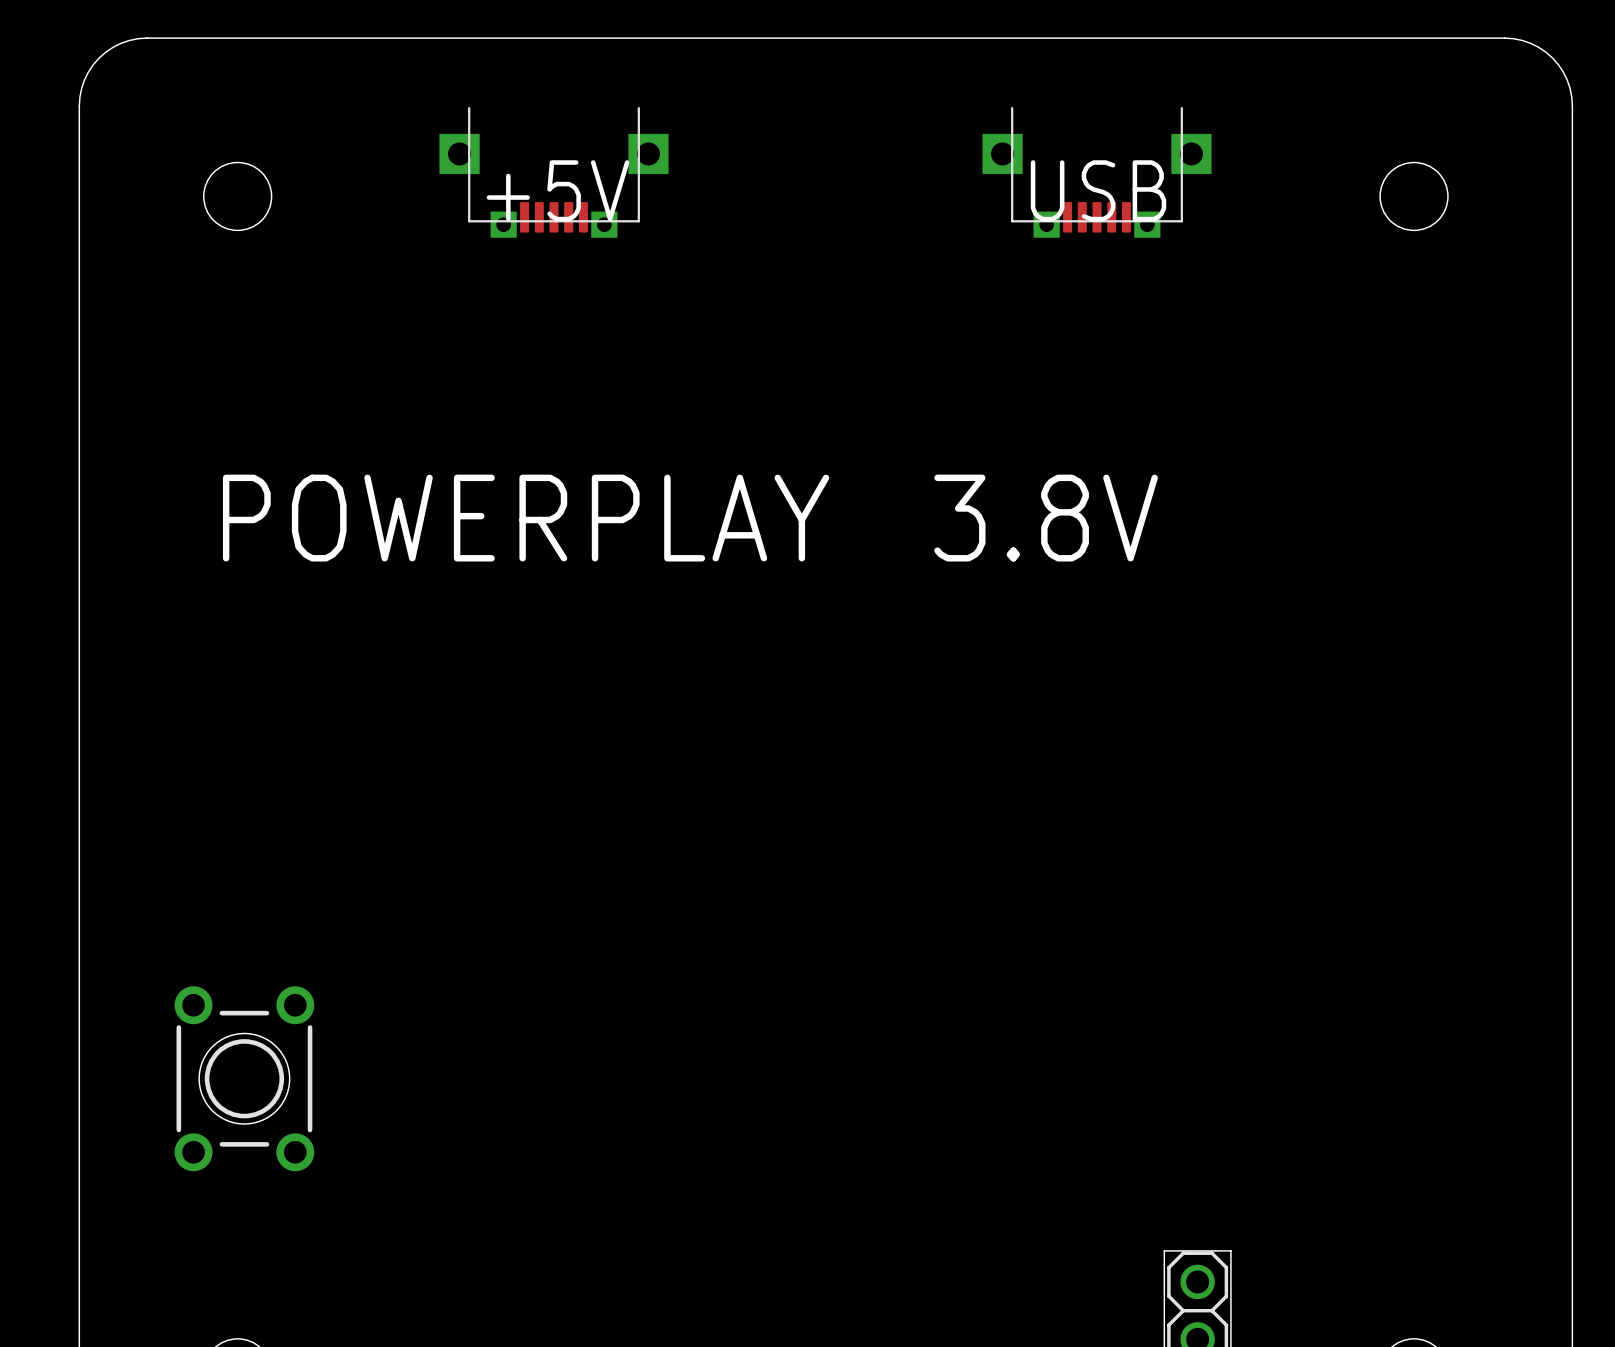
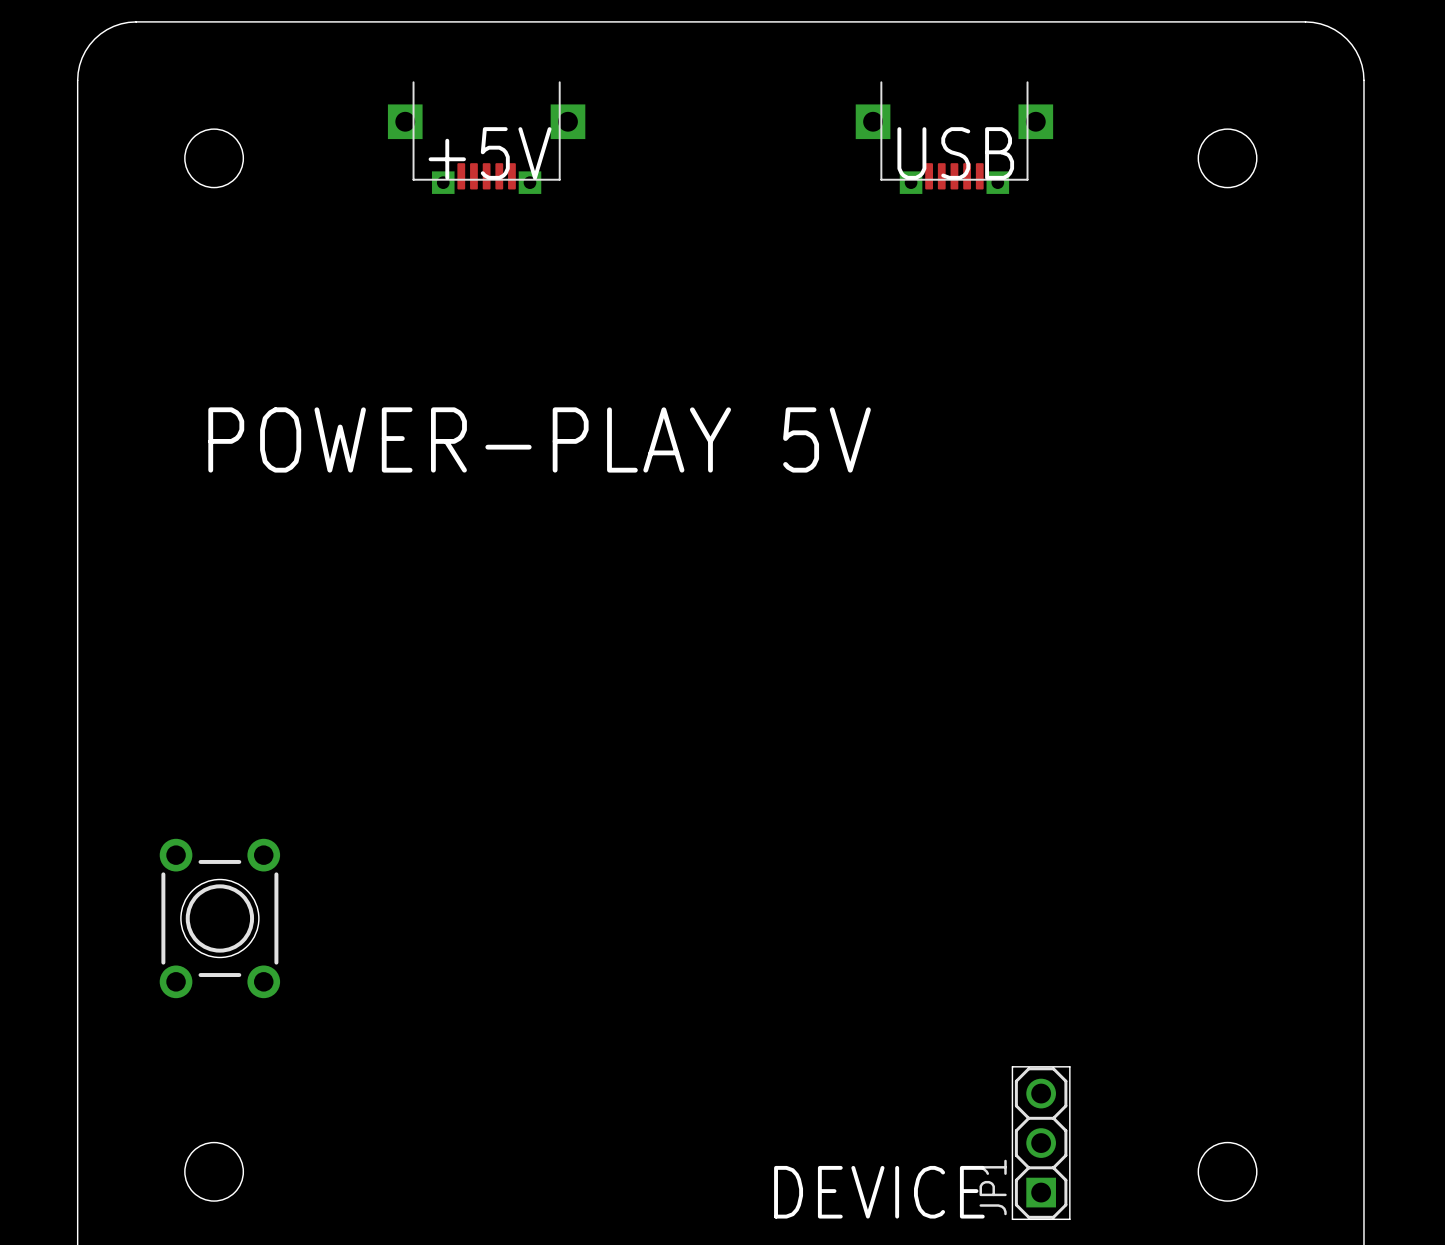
text: POWERPLAY (526, 518) -> POWER-PLAY 5V (539, 439)
text: 3.8V (1046, 518) -> none

